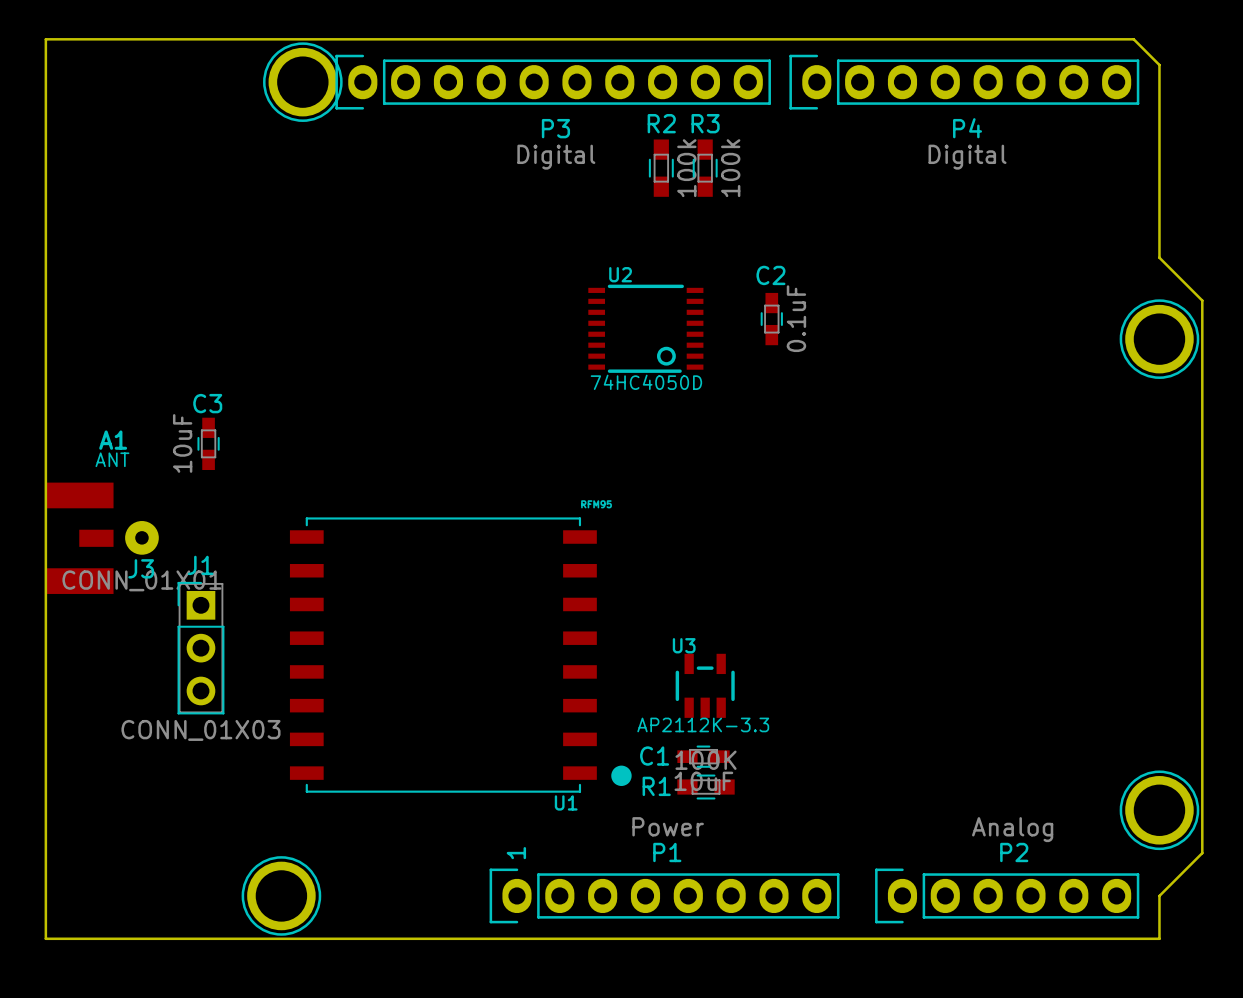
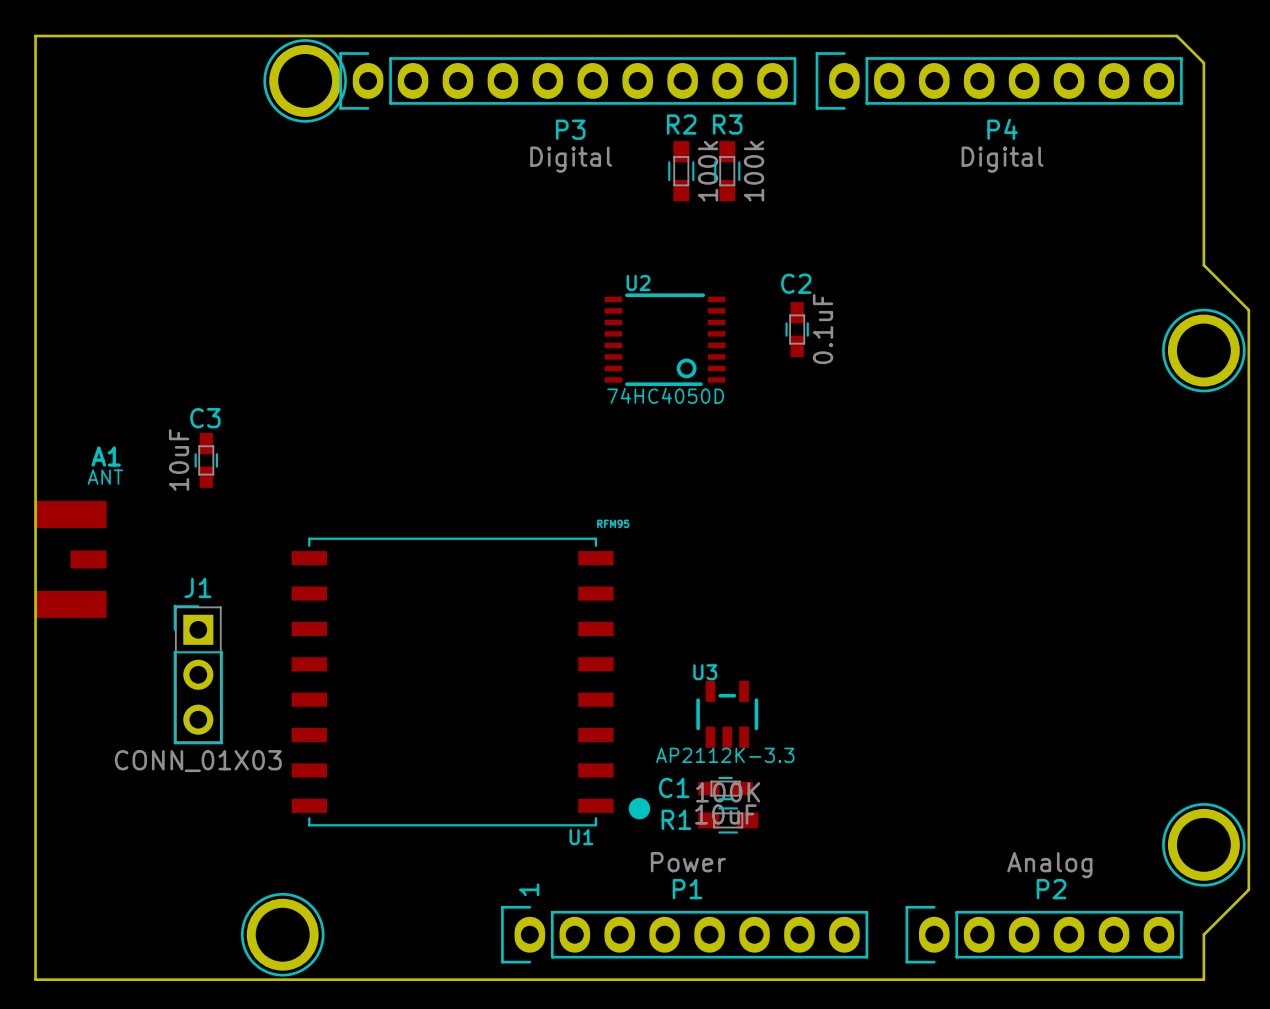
J3: CONN_01X01 (141, 537) -> none

